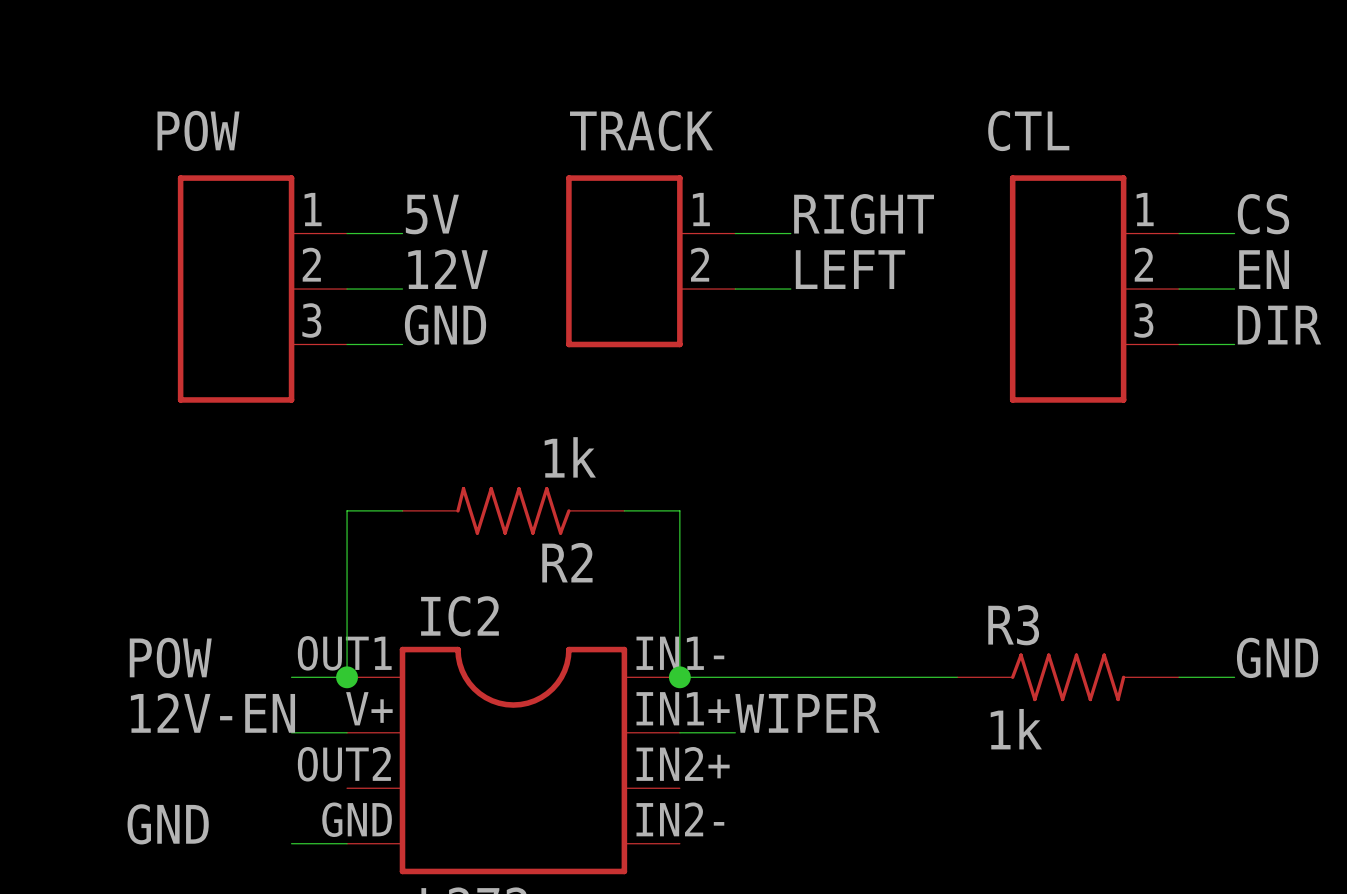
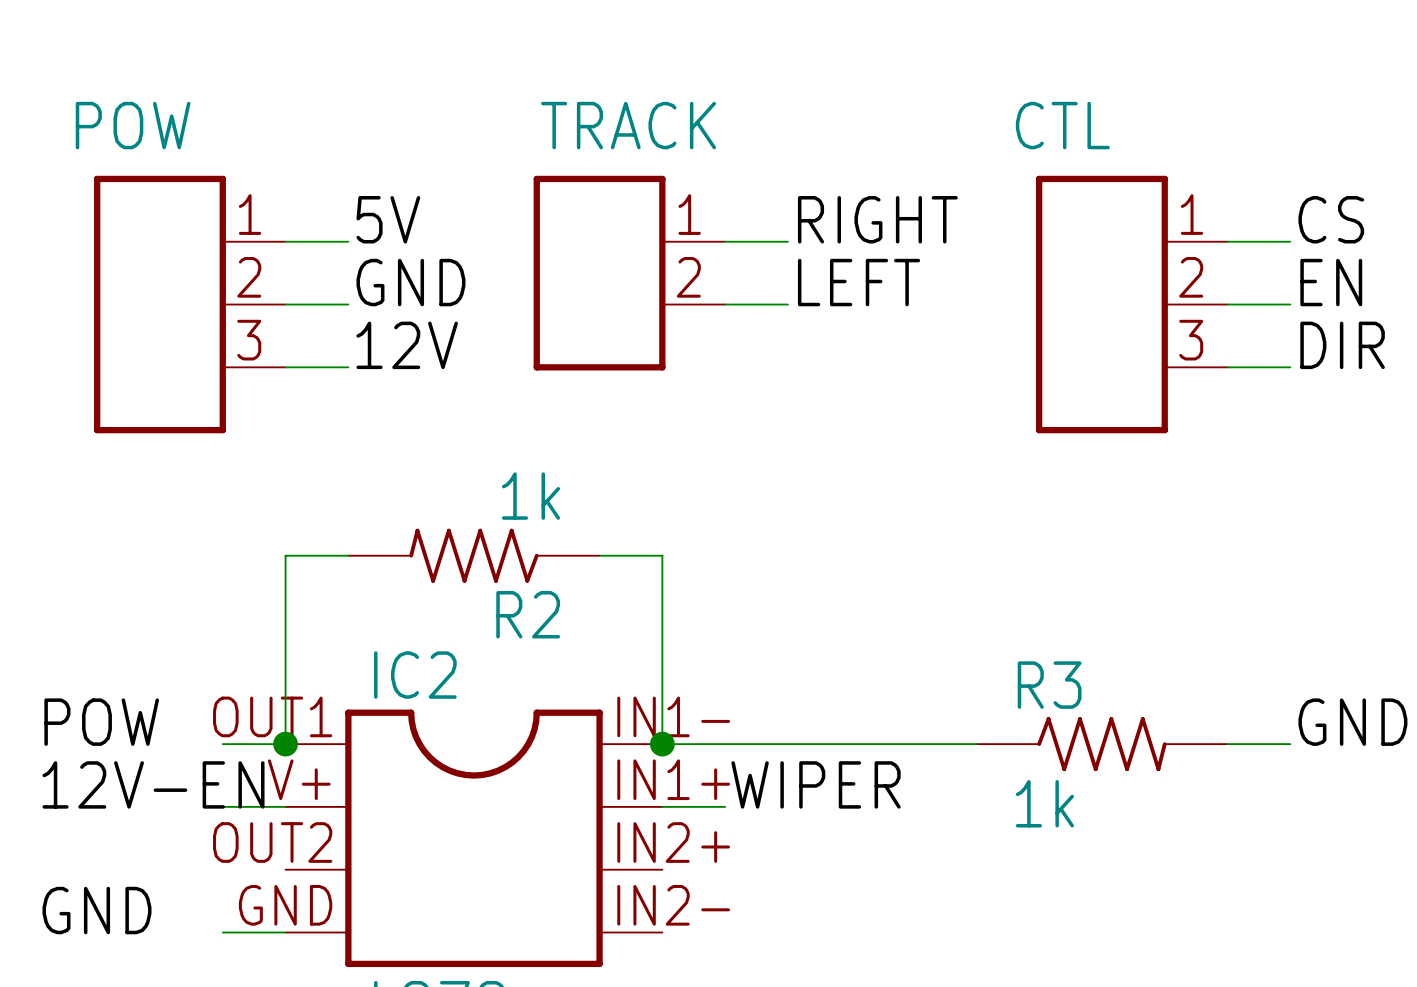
label: 12V (448, 269) -> GND (410, 282)
label: GND (445, 325) -> 12V (407, 345)

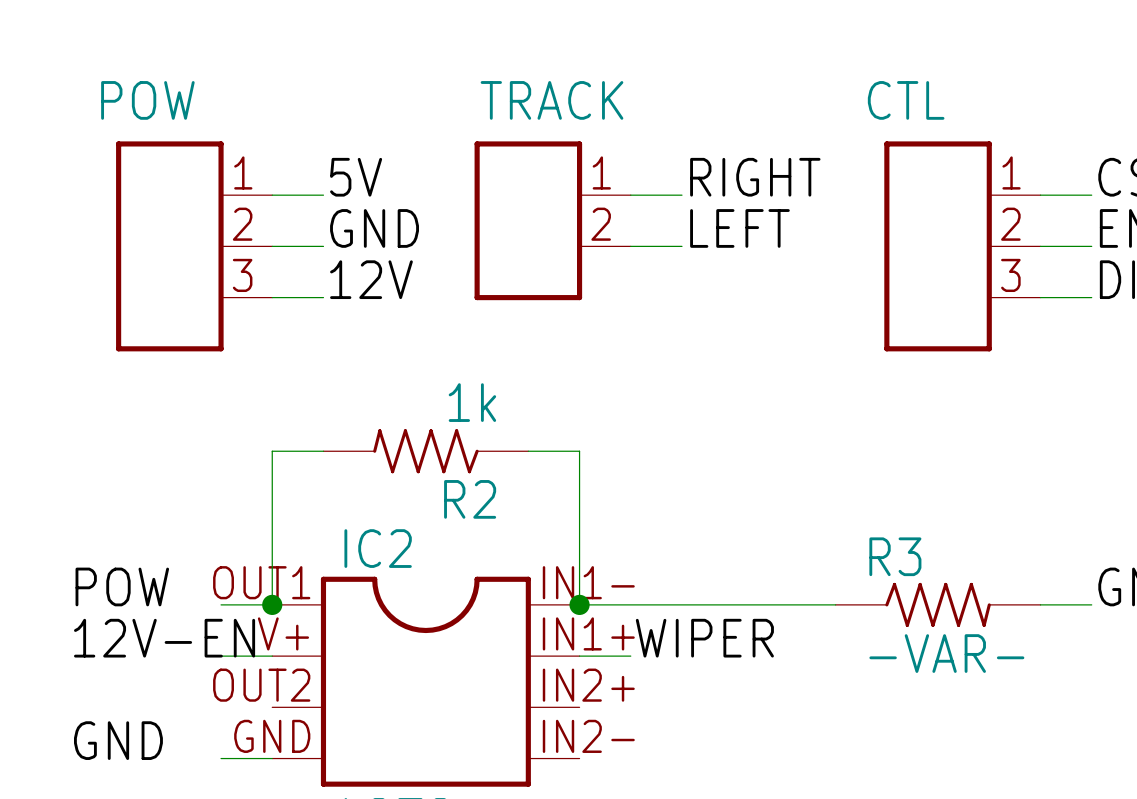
R3 value: 1k (1044, 803) -> -VAR- (946, 653)

